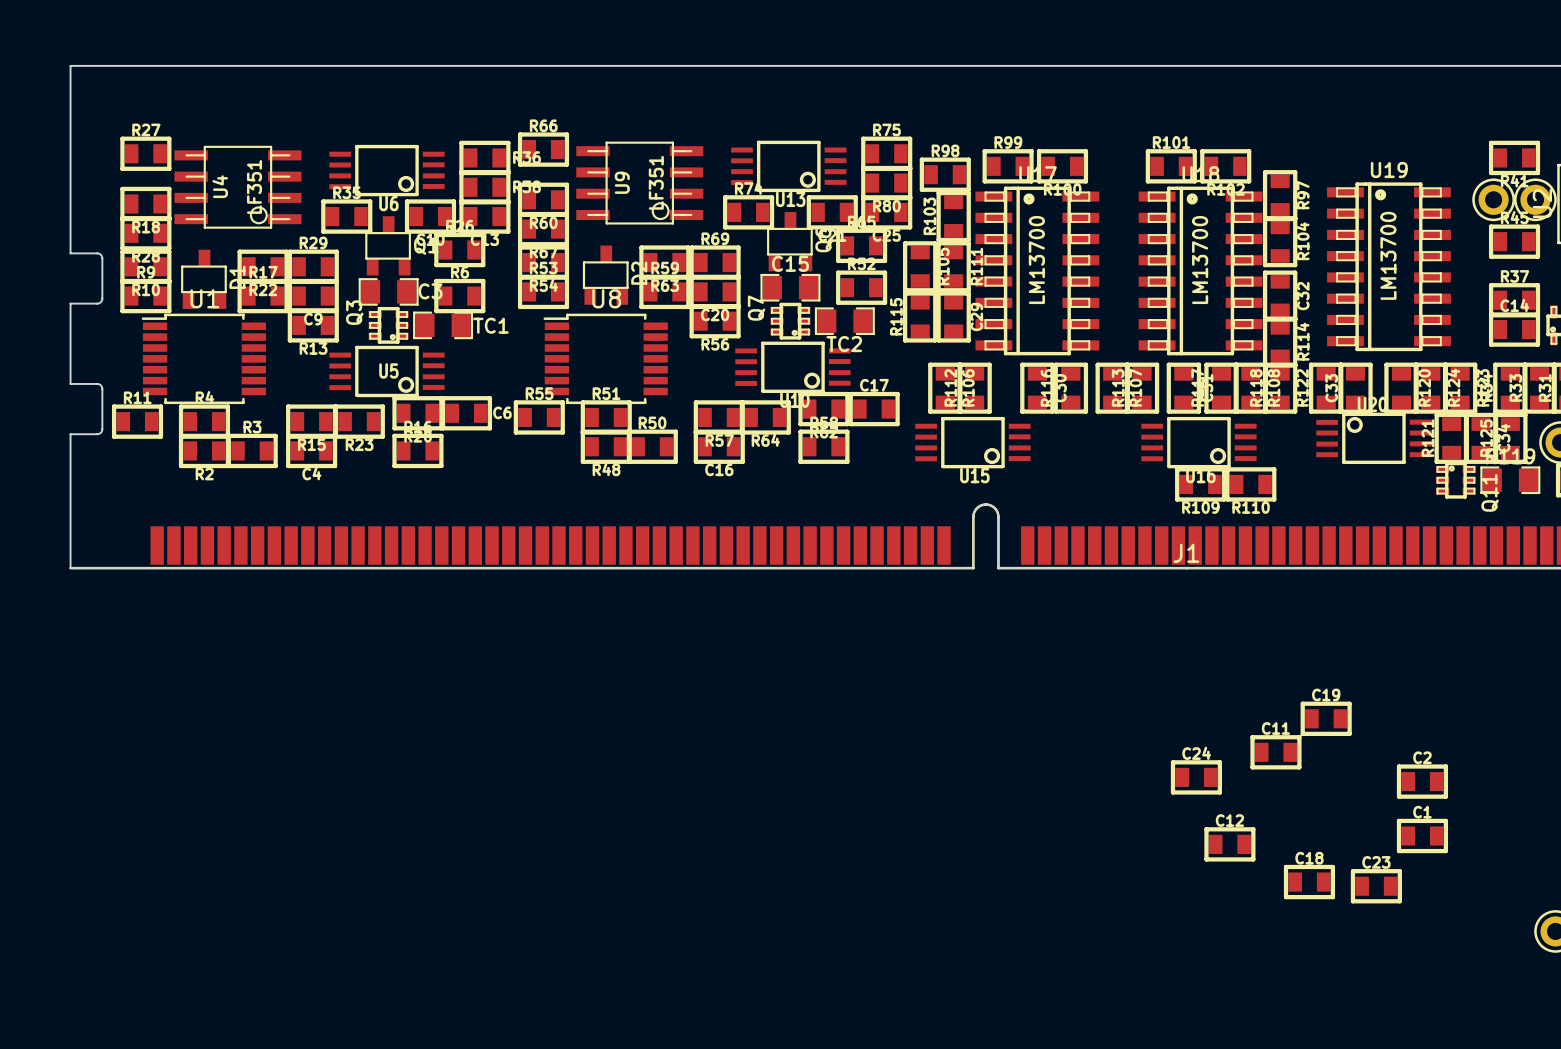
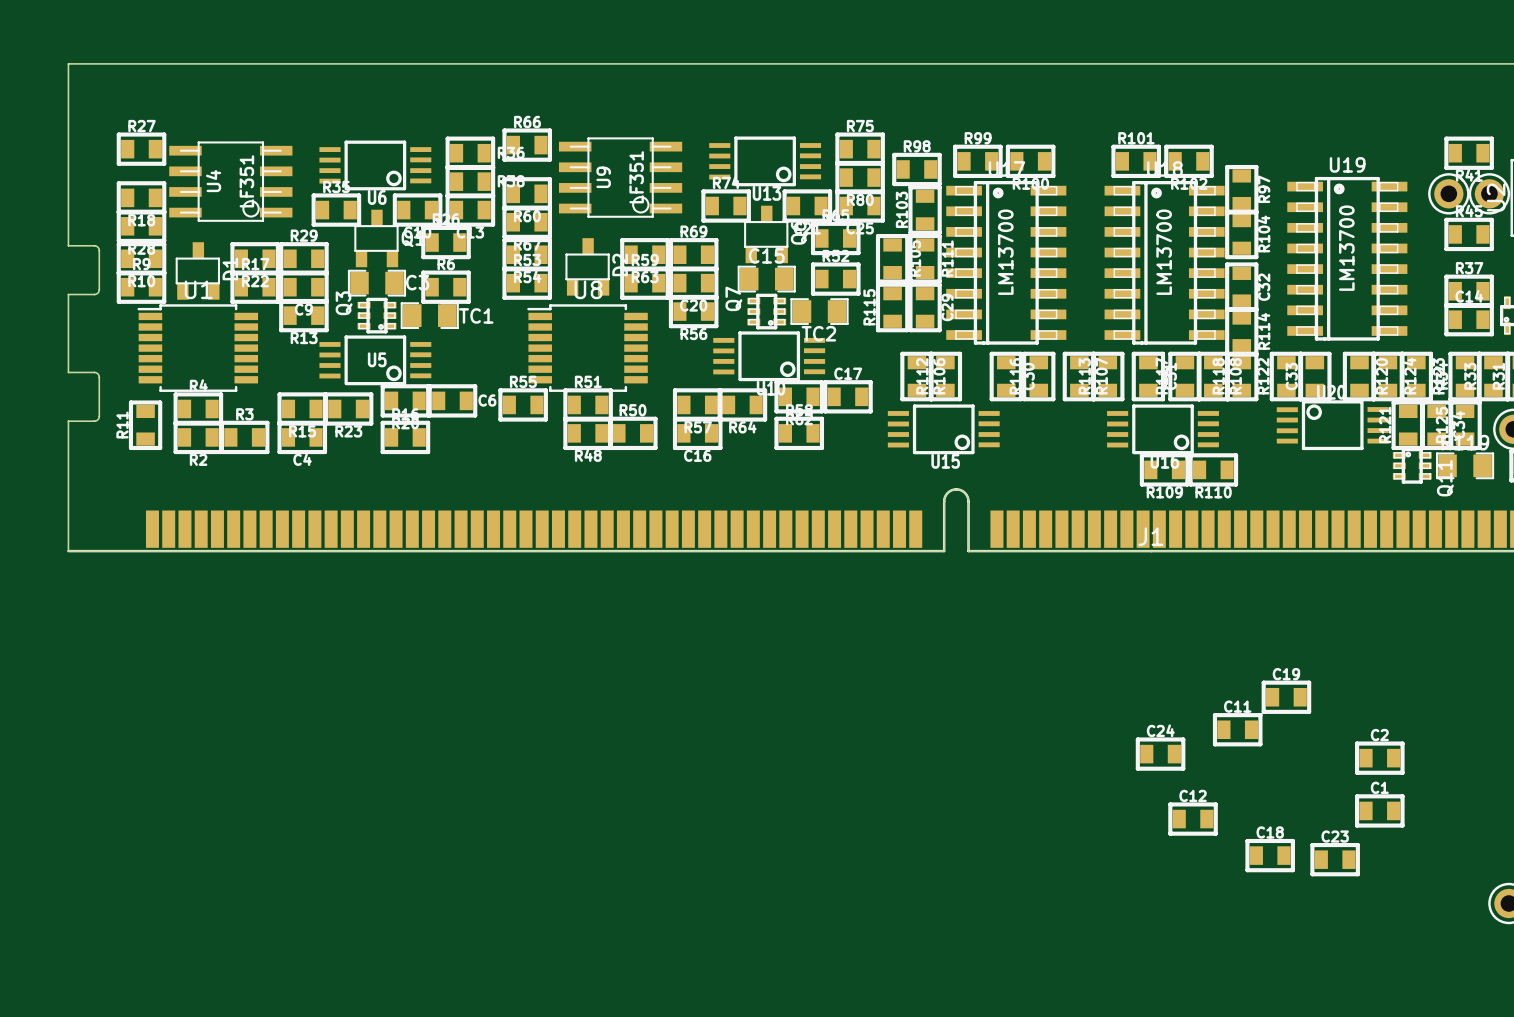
R11 rotation: 0° (137, 421) -> 90° clockwise (145, 425)

